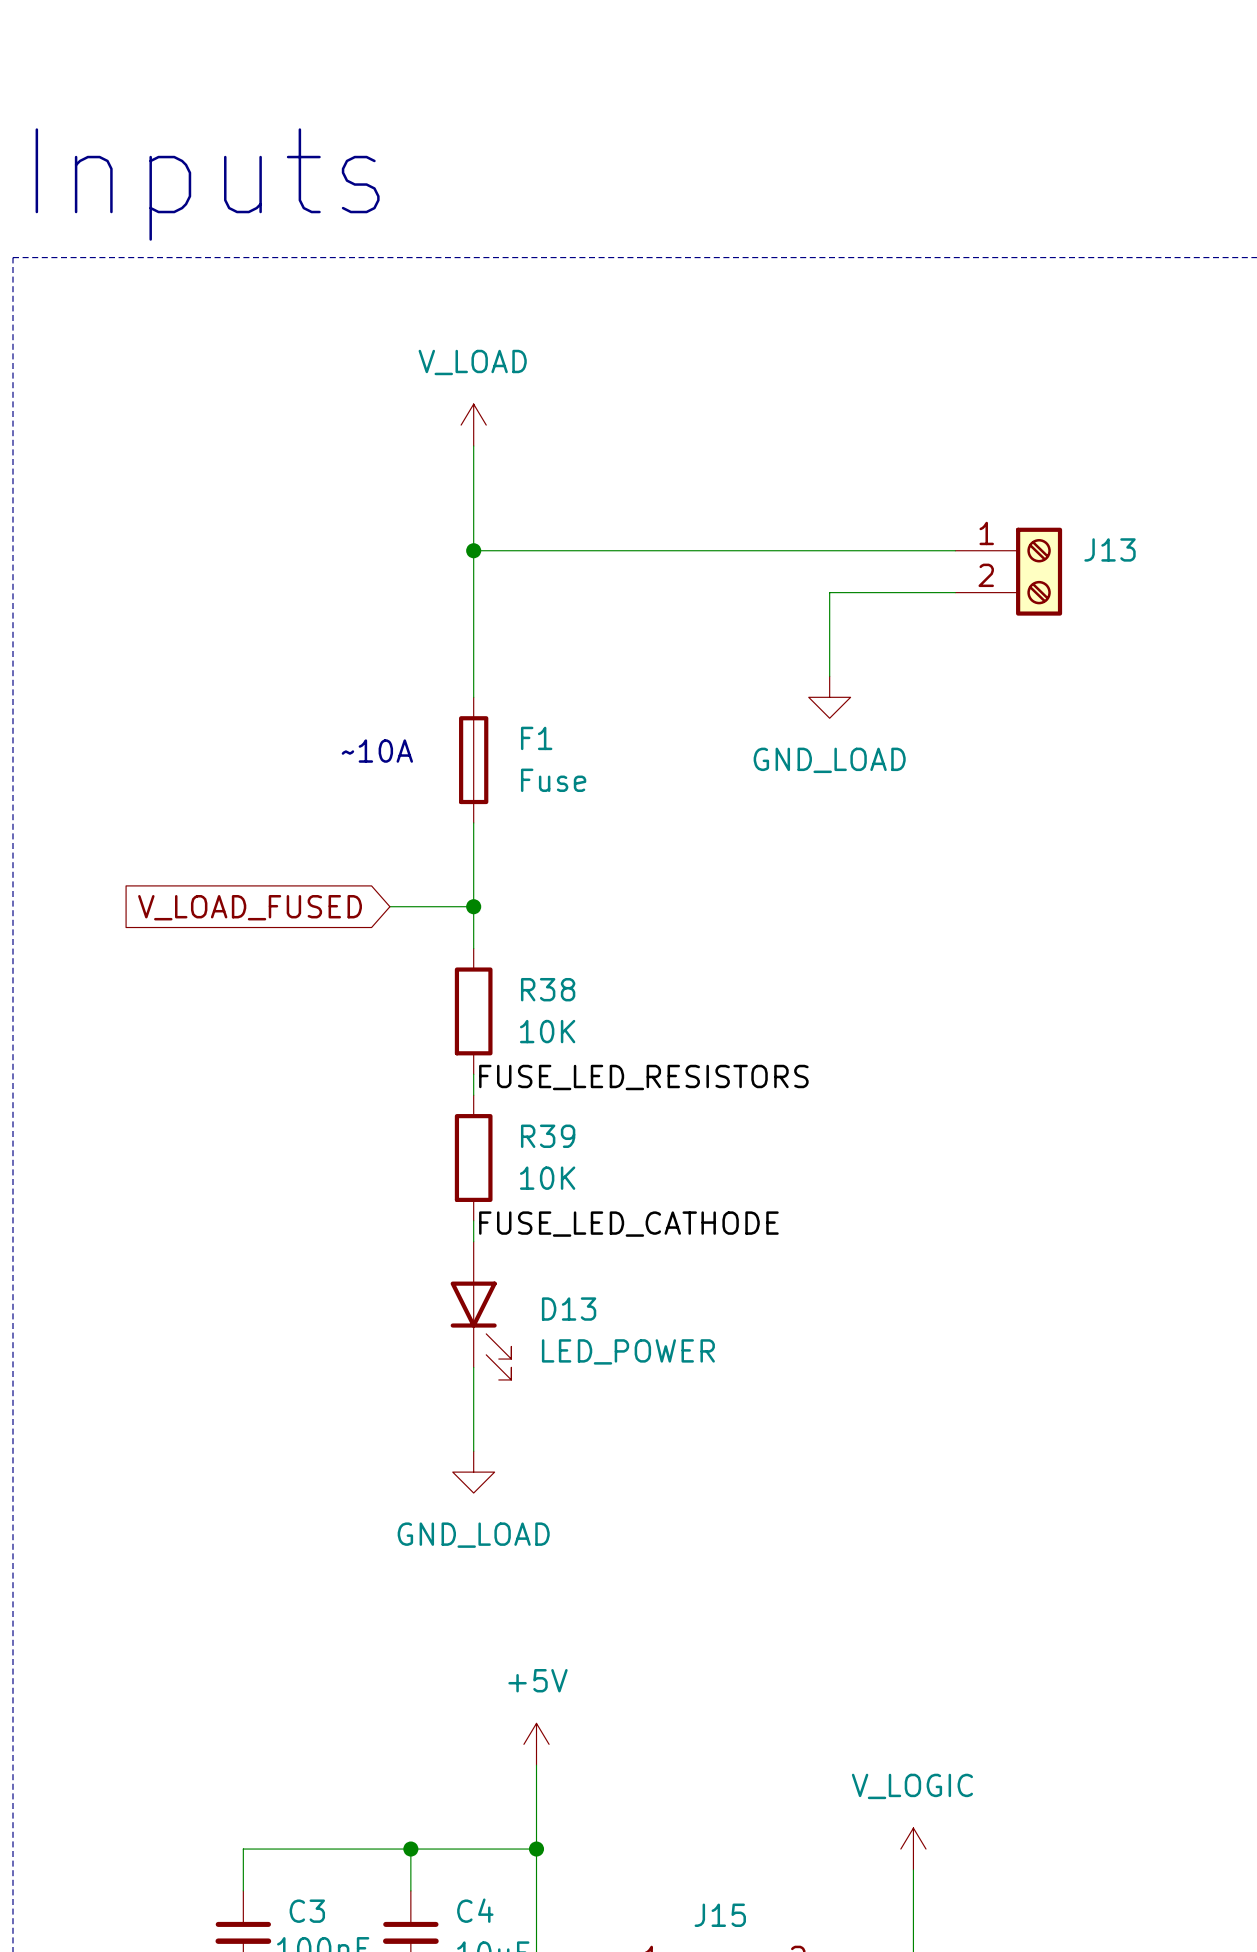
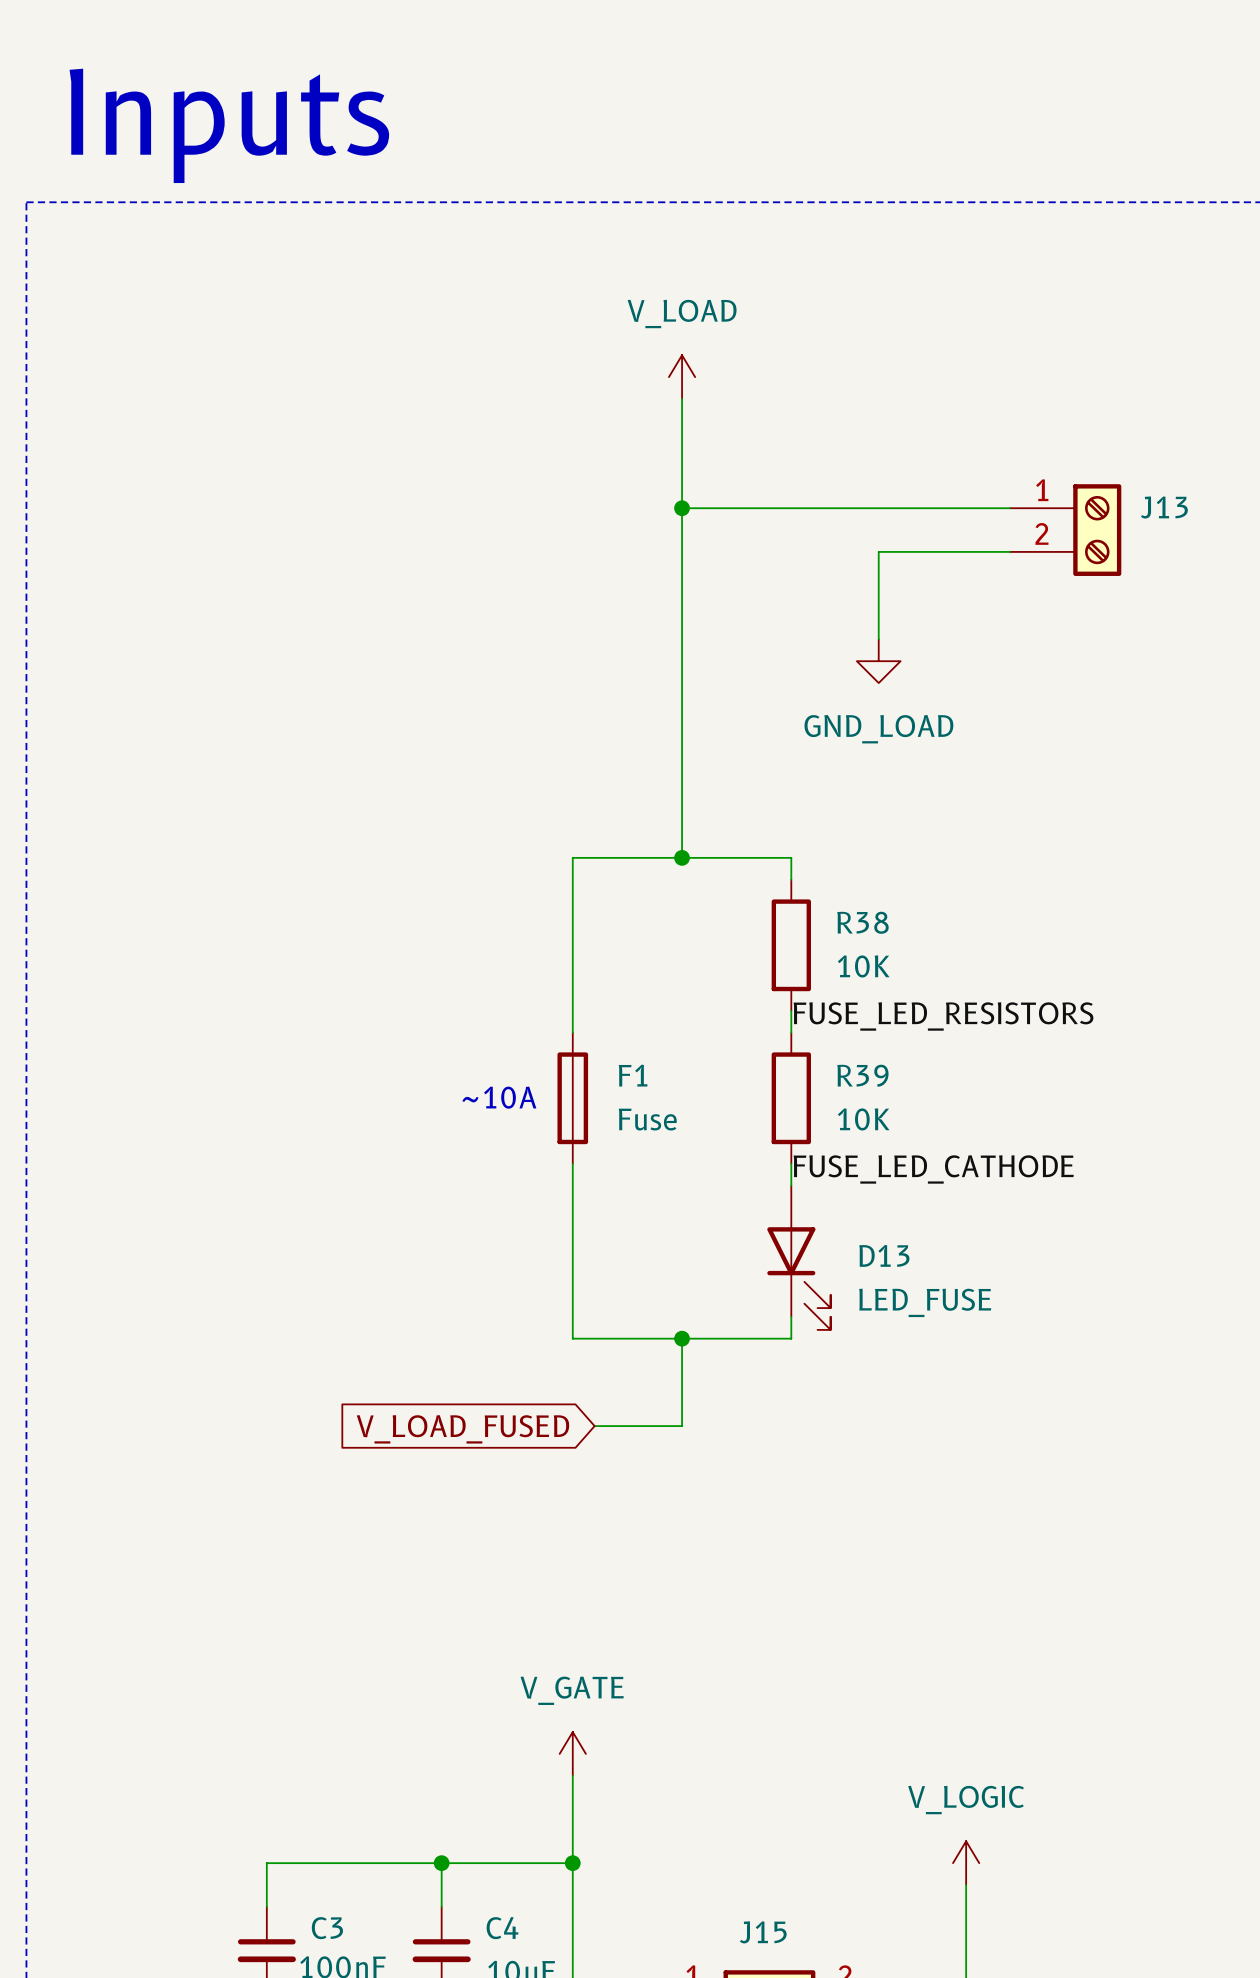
power symbol position: V_LOAD (473, 425) -> V_LOAD (682, 377)
wire: (473, 446) (473, 697) -> none
wire: none -> (682, 398) (682, 857)
wire: (473, 550) (641, 550) -> none
junction: (473, 550) -> none
junction: none -> (682, 508)
text position: ~10A (377, 751) -> ~10A (499, 1097)
F1 position: (473, 760) -> (572, 1098)
wire: (473, 822) (473, 948) -> none
junction: none -> (682, 857)
wire: (389, 906) (473, 906) -> none
junction: (473, 906) -> none
wire: none -> (791, 879) (791, 857) (572, 857) (572, 1032)
global label: V_LOAD_FUSED (250, 907) -> none
R38 position: (473, 1011) -> (791, 945)
wire: (473, 1074) (473, 1095) -> (791, 1010) (791, 1032)
label position: FUSE_LED_RESISTORS (643, 1077) -> FUSE_LED_RESISTORS (943, 1016)
R39 position: (473, 1158) -> (791, 1098)
wire: none -> (572, 1163) (572, 1338) (791, 1338) (791, 1316)
wire: (473, 1220) (473, 1241) -> (791, 1163) (791, 1185)
label position: FUSE_LED_CATHODE (628, 1224) -> FUSE_LED_CATHODE (933, 1169)
D13 position: (481, 1310) -> (798, 1257)
wire: none -> (682, 1338) (682, 1426) (594, 1426)
junction: none -> (682, 1338)
D13 value: LED_POWER (628, 1351) -> LED_FUSE (925, 1302)
wire: (473, 1367) (473, 1451) -> none
global label: none -> V_LOAD_FUSED (462, 1429)
power symbol: GND_LOAD (473, 1472) -> none
power symbol: +5V (536, 1744) -> V_GATE (572, 1753)

